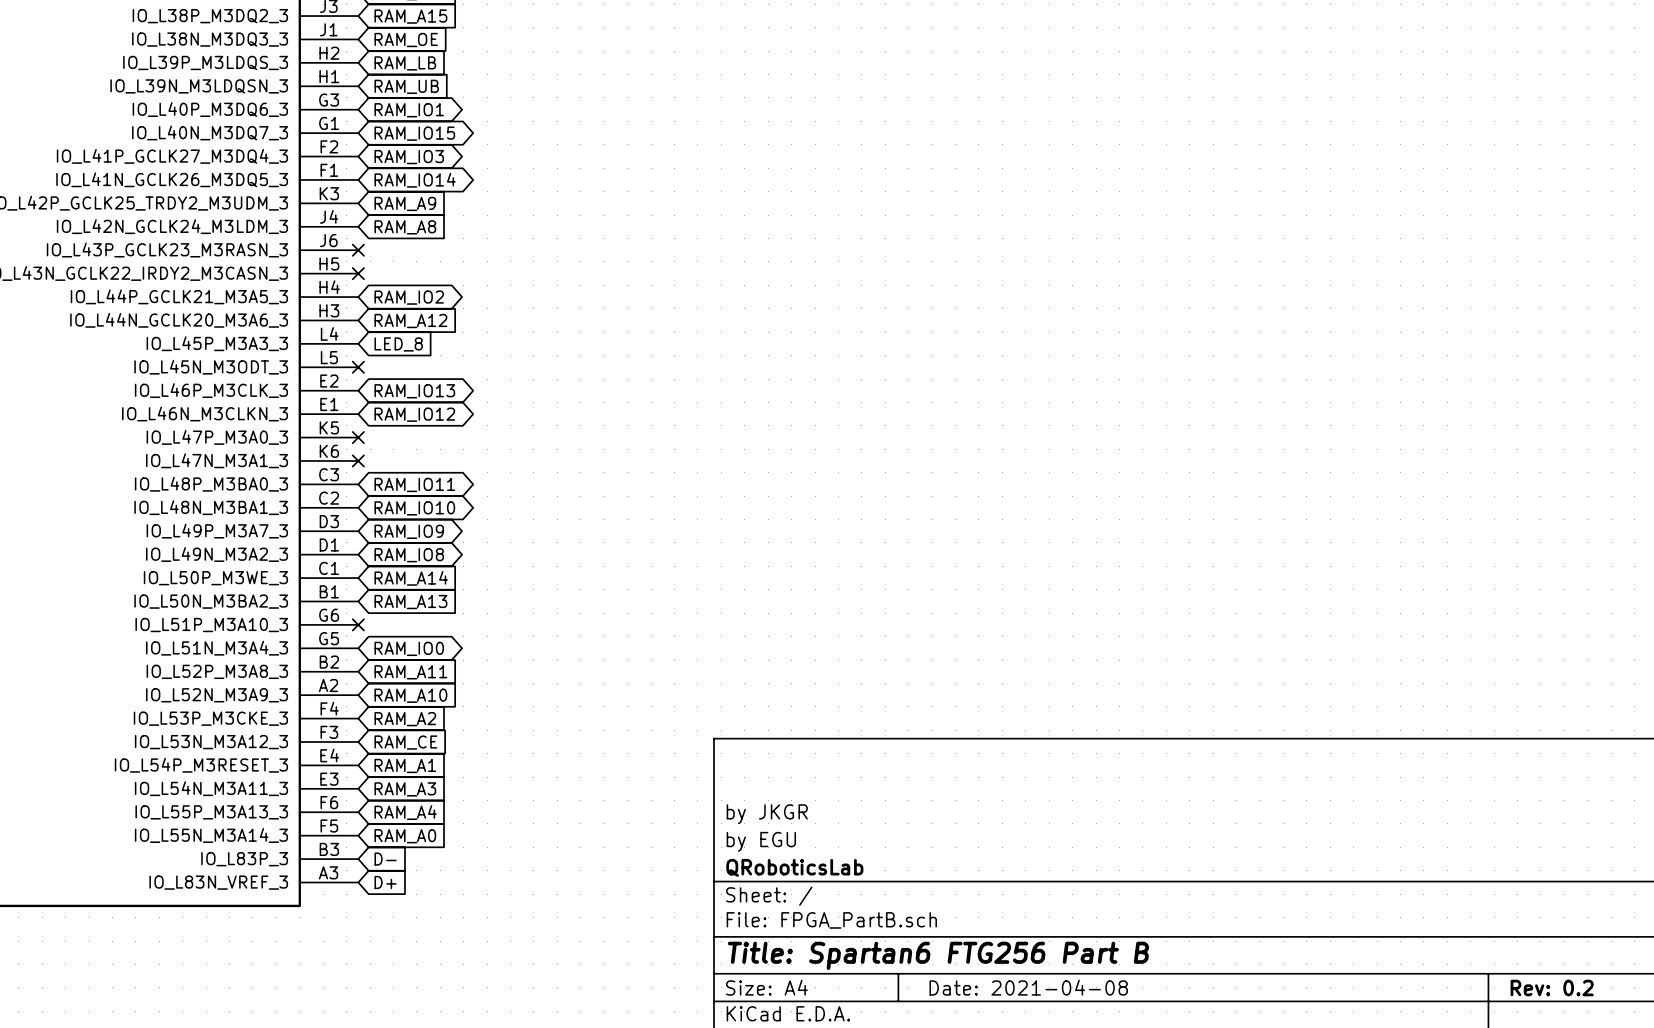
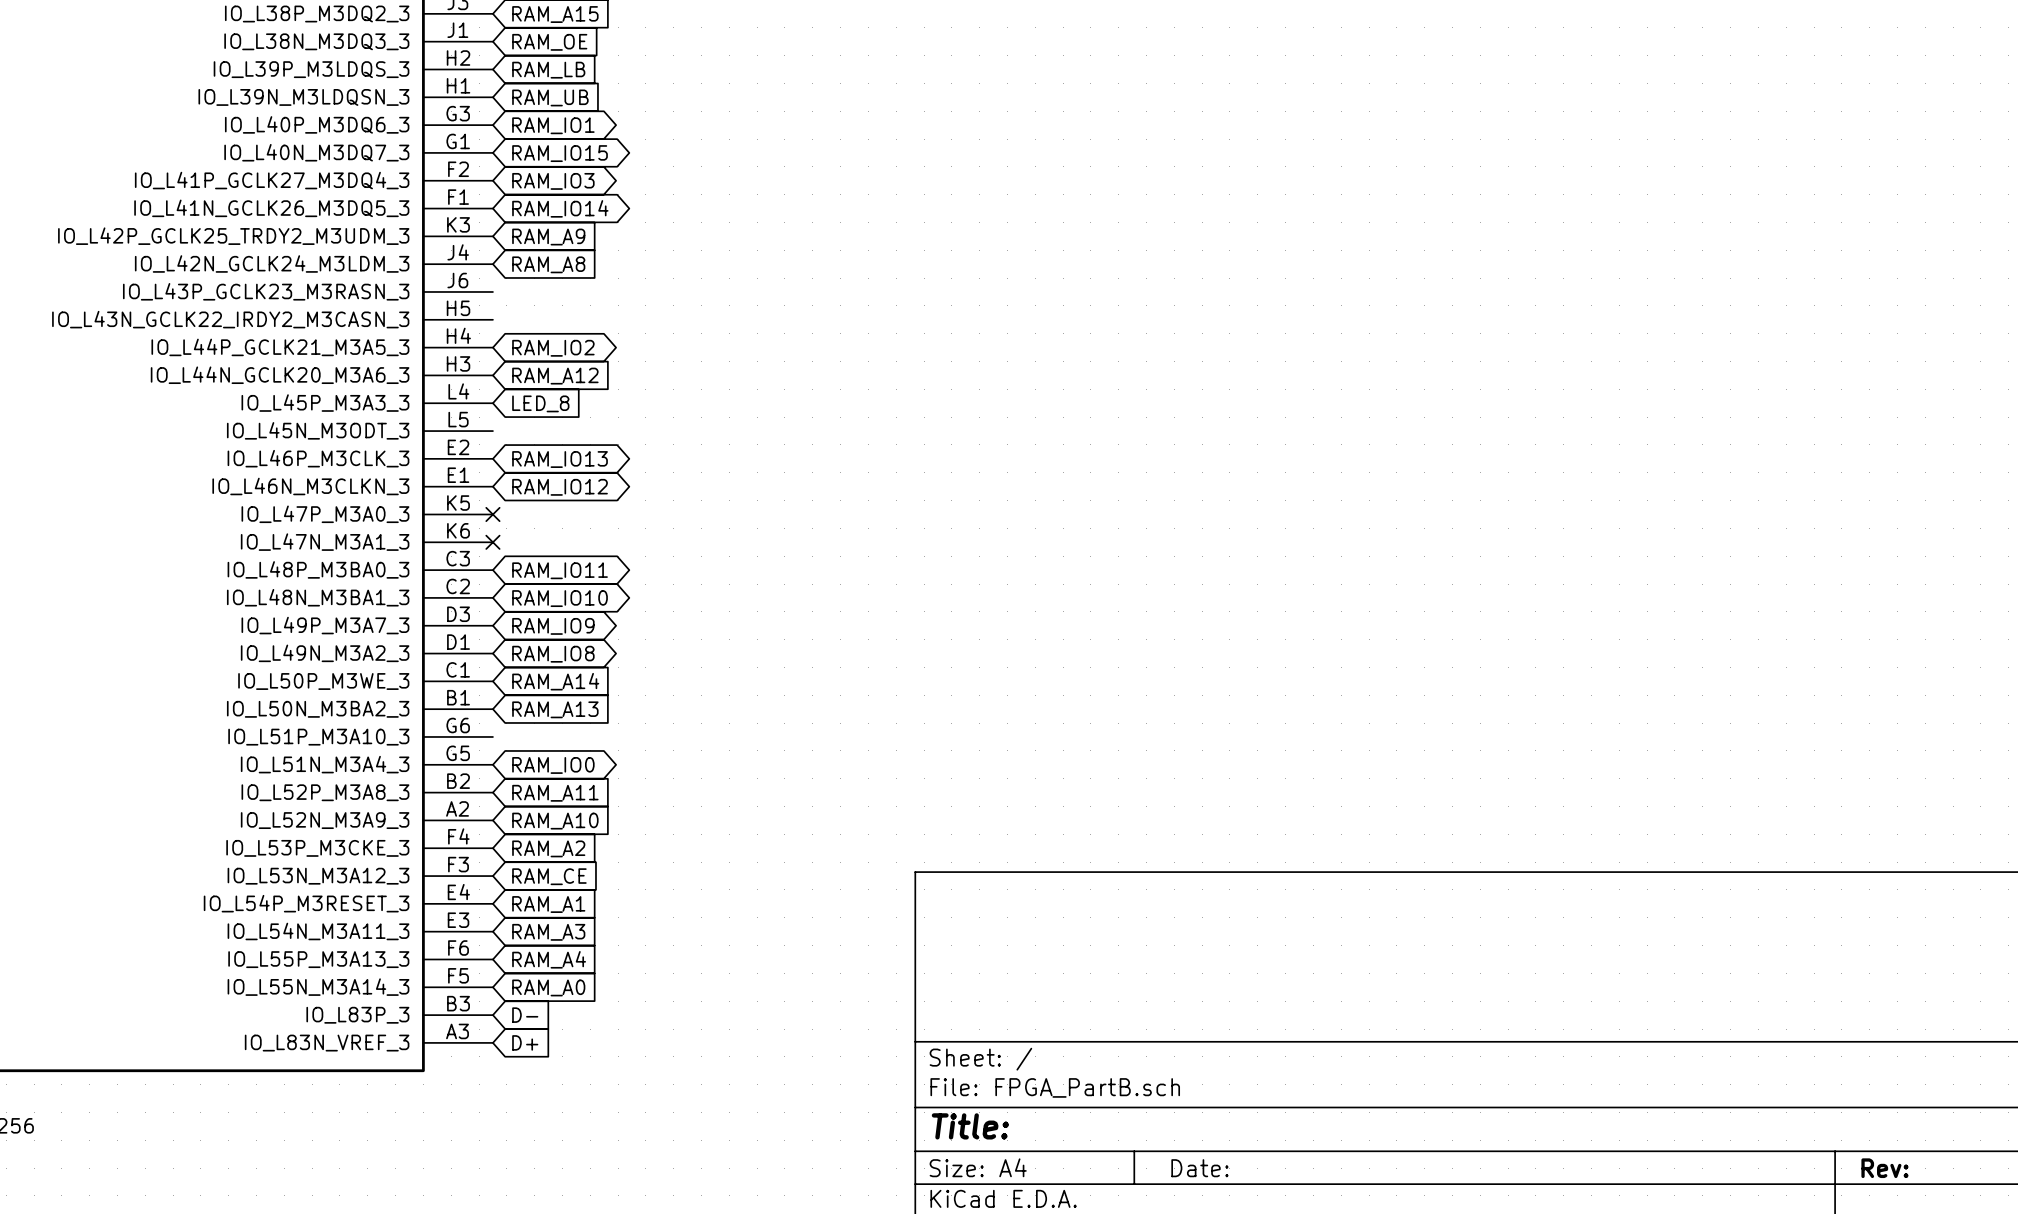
no-connect mark: (358, 250) -> none
no-connect mark: (358, 273) -> none
no-connect mark: (358, 367) -> none
no-connect mark: (358, 624) -> none
title block: by JKGR (767, 814) -> none
title block: by EGU (761, 841) -> none
title block: QRoboticsLab (794, 867) -> none
title block: Title: Spartan6 FTG256 Part B (938, 955) -> Title: (970, 1126)
title block: Date: 2021-04-08 (1028, 987) -> Date: (1199, 1168)
title block: Rev: 0.2 (1552, 987) -> Rev: (1884, 1168)

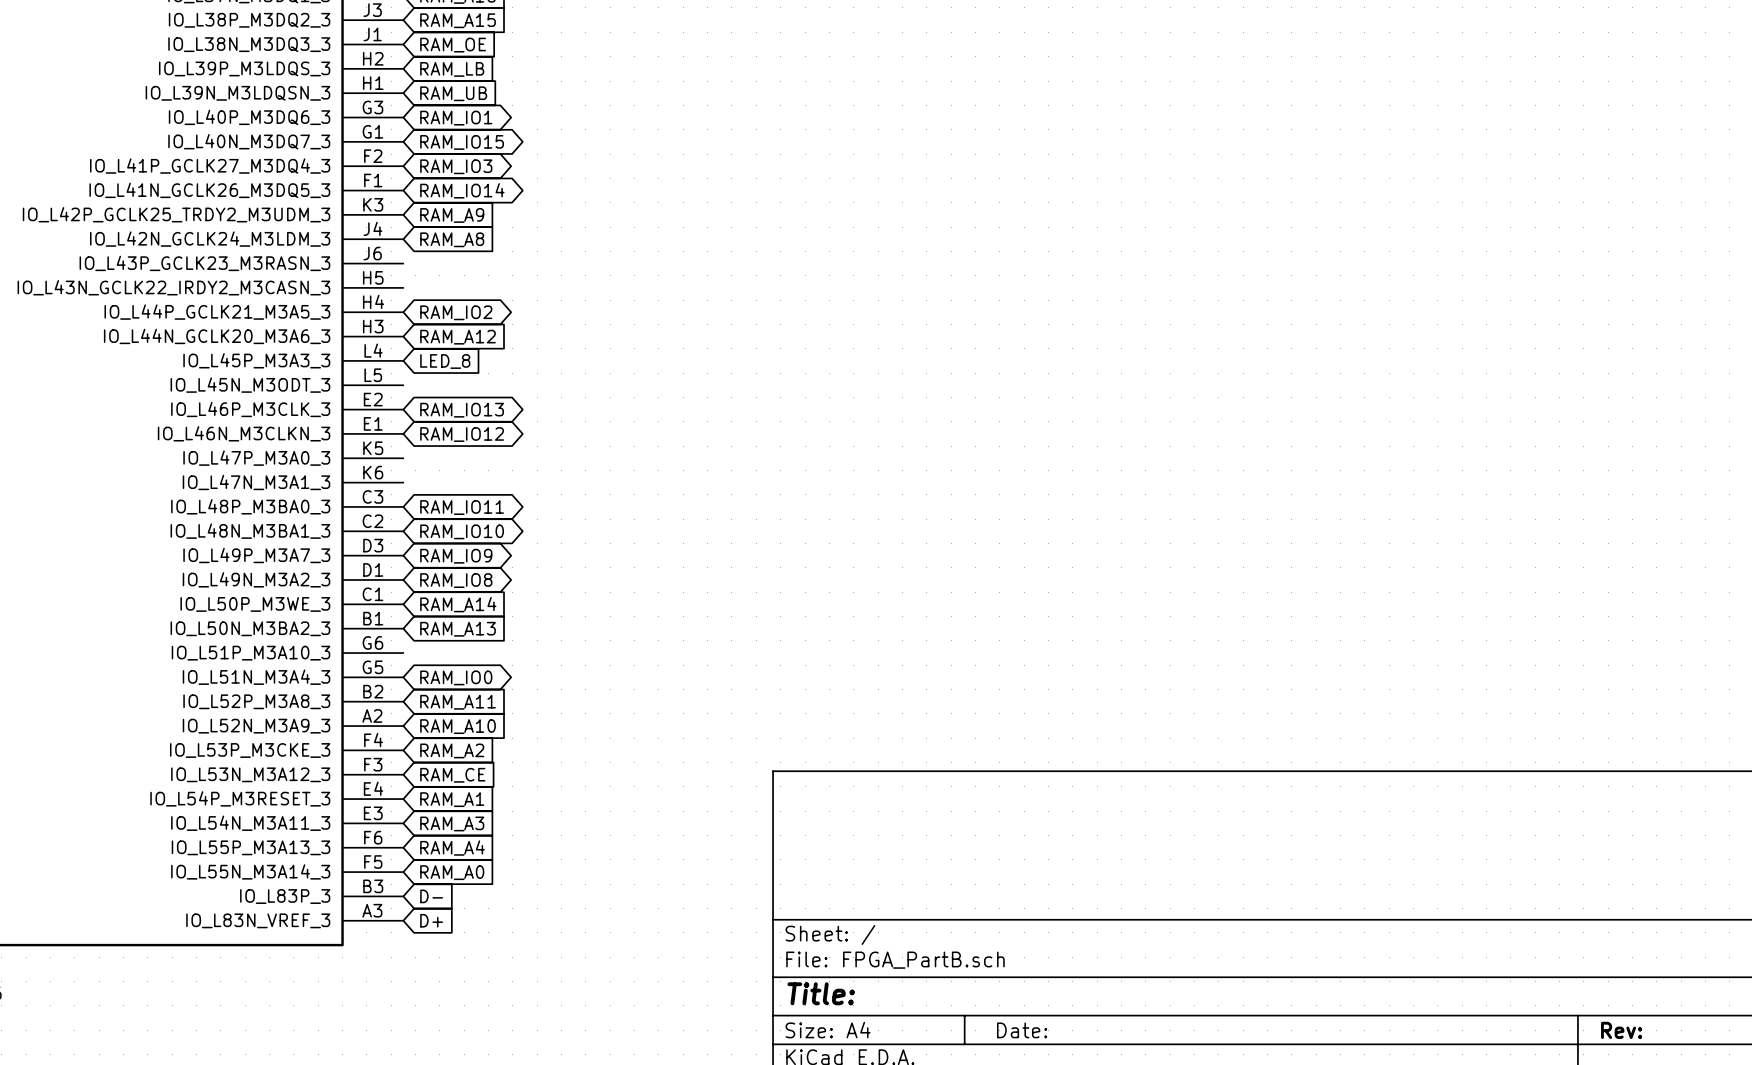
no-connect mark: (492, 514) -> none
no-connect mark: (492, 542) -> none

